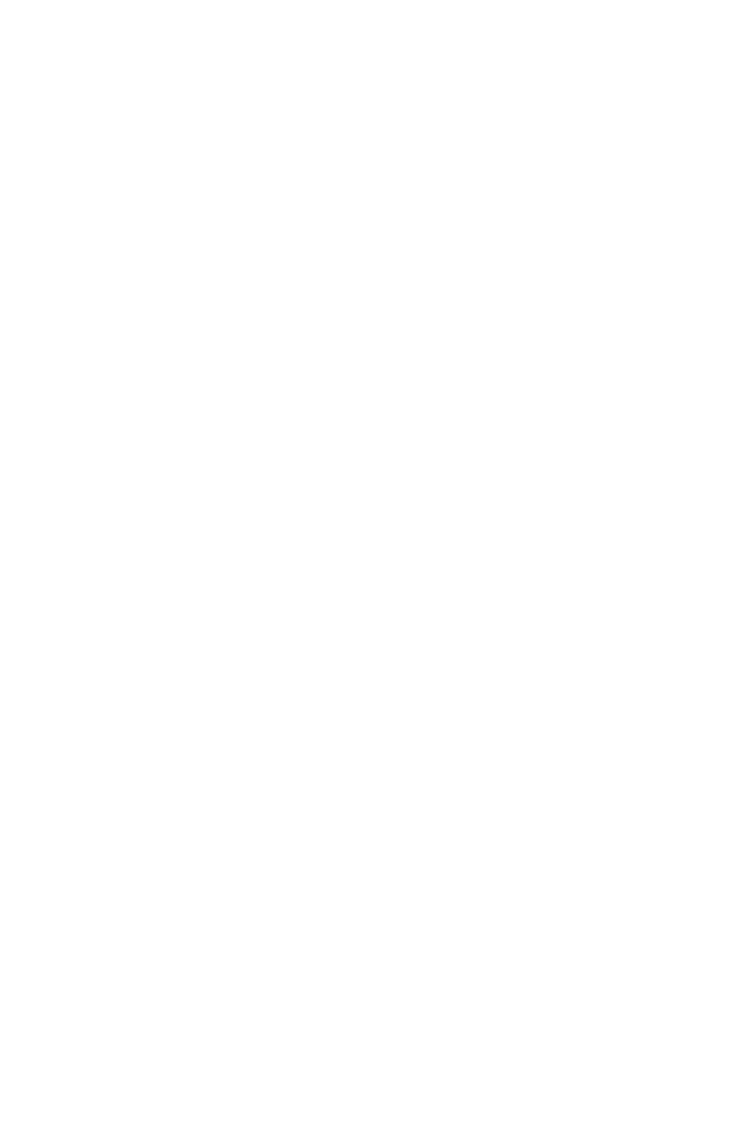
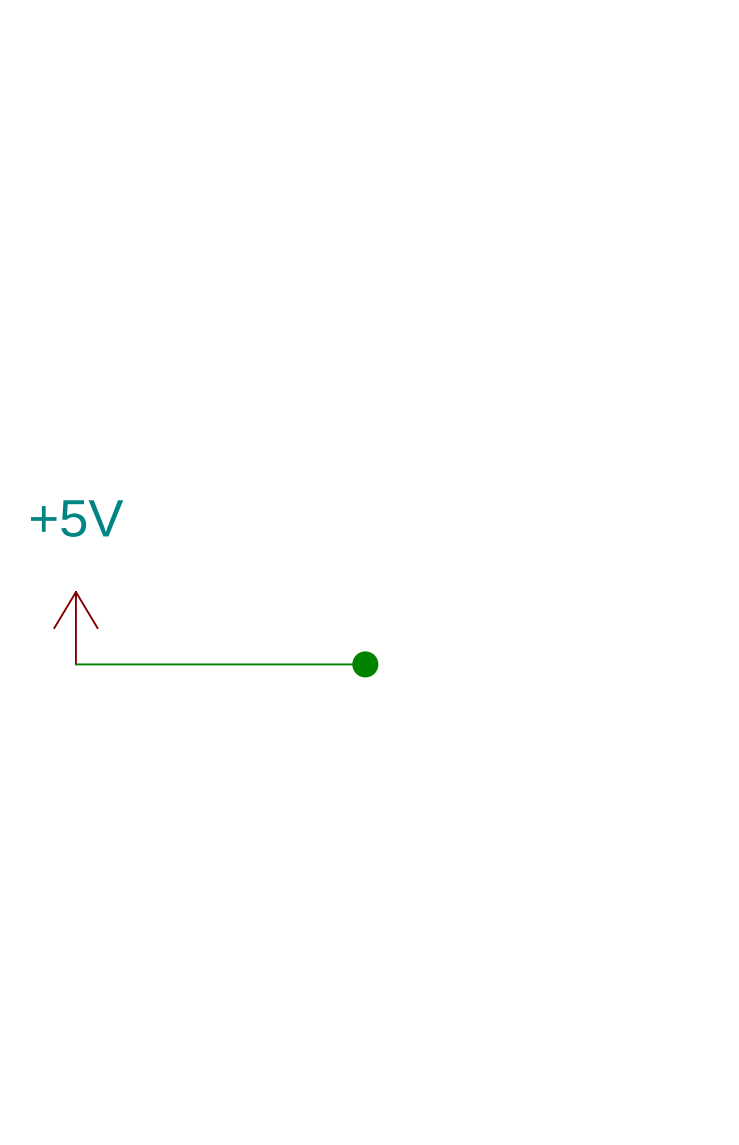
power symbol: none -> +5V (75, 628)
wire: none -> (75, 664) (365, 664)
junction: none -> (365, 664)

